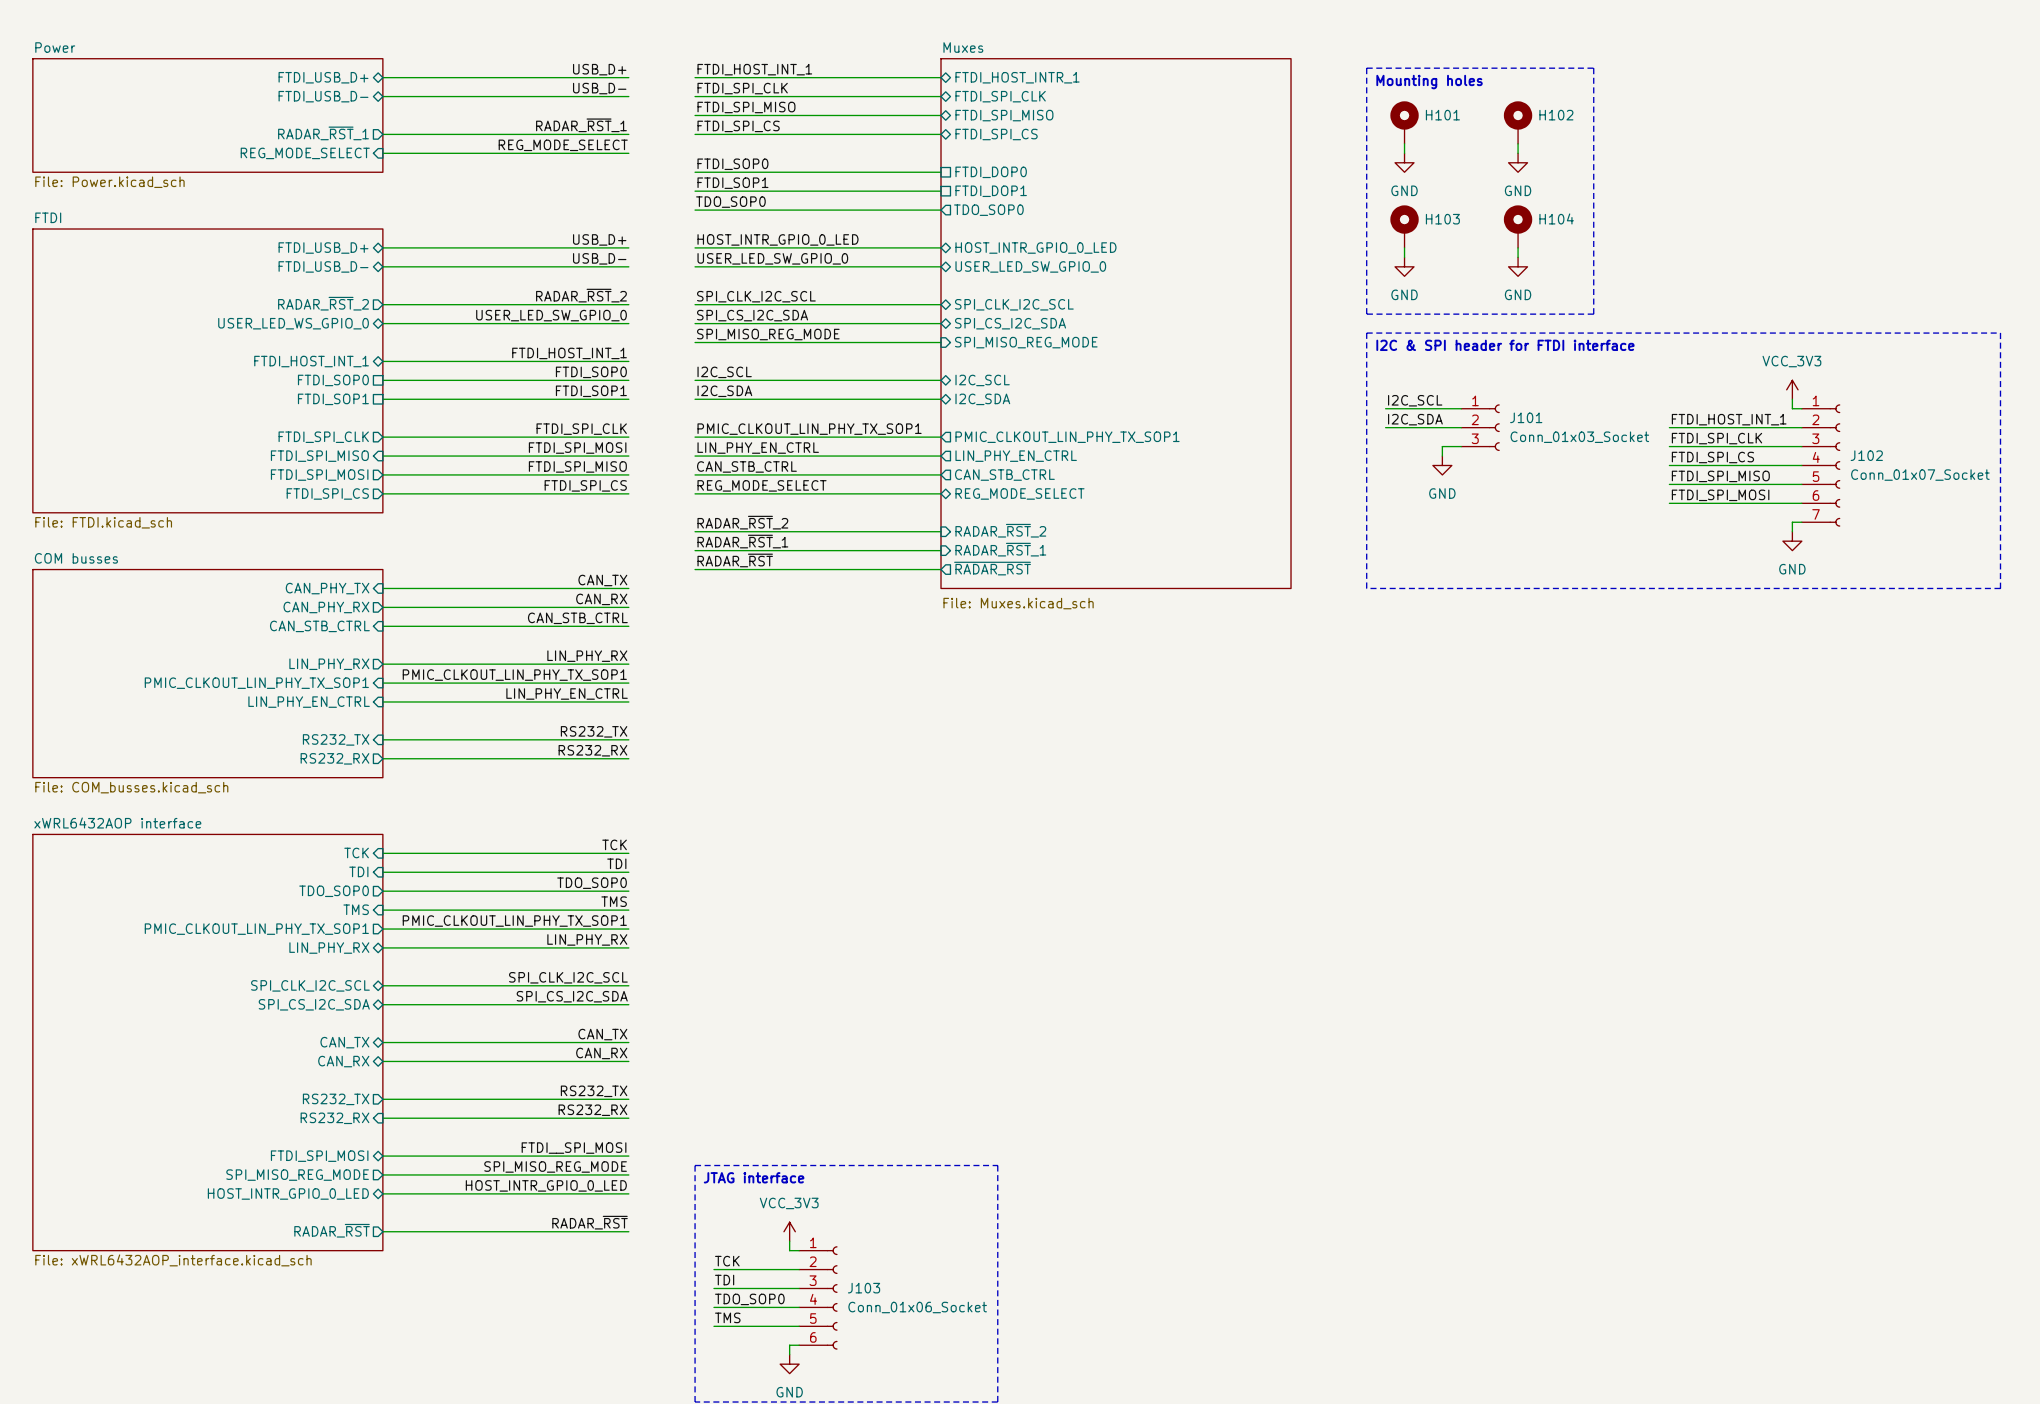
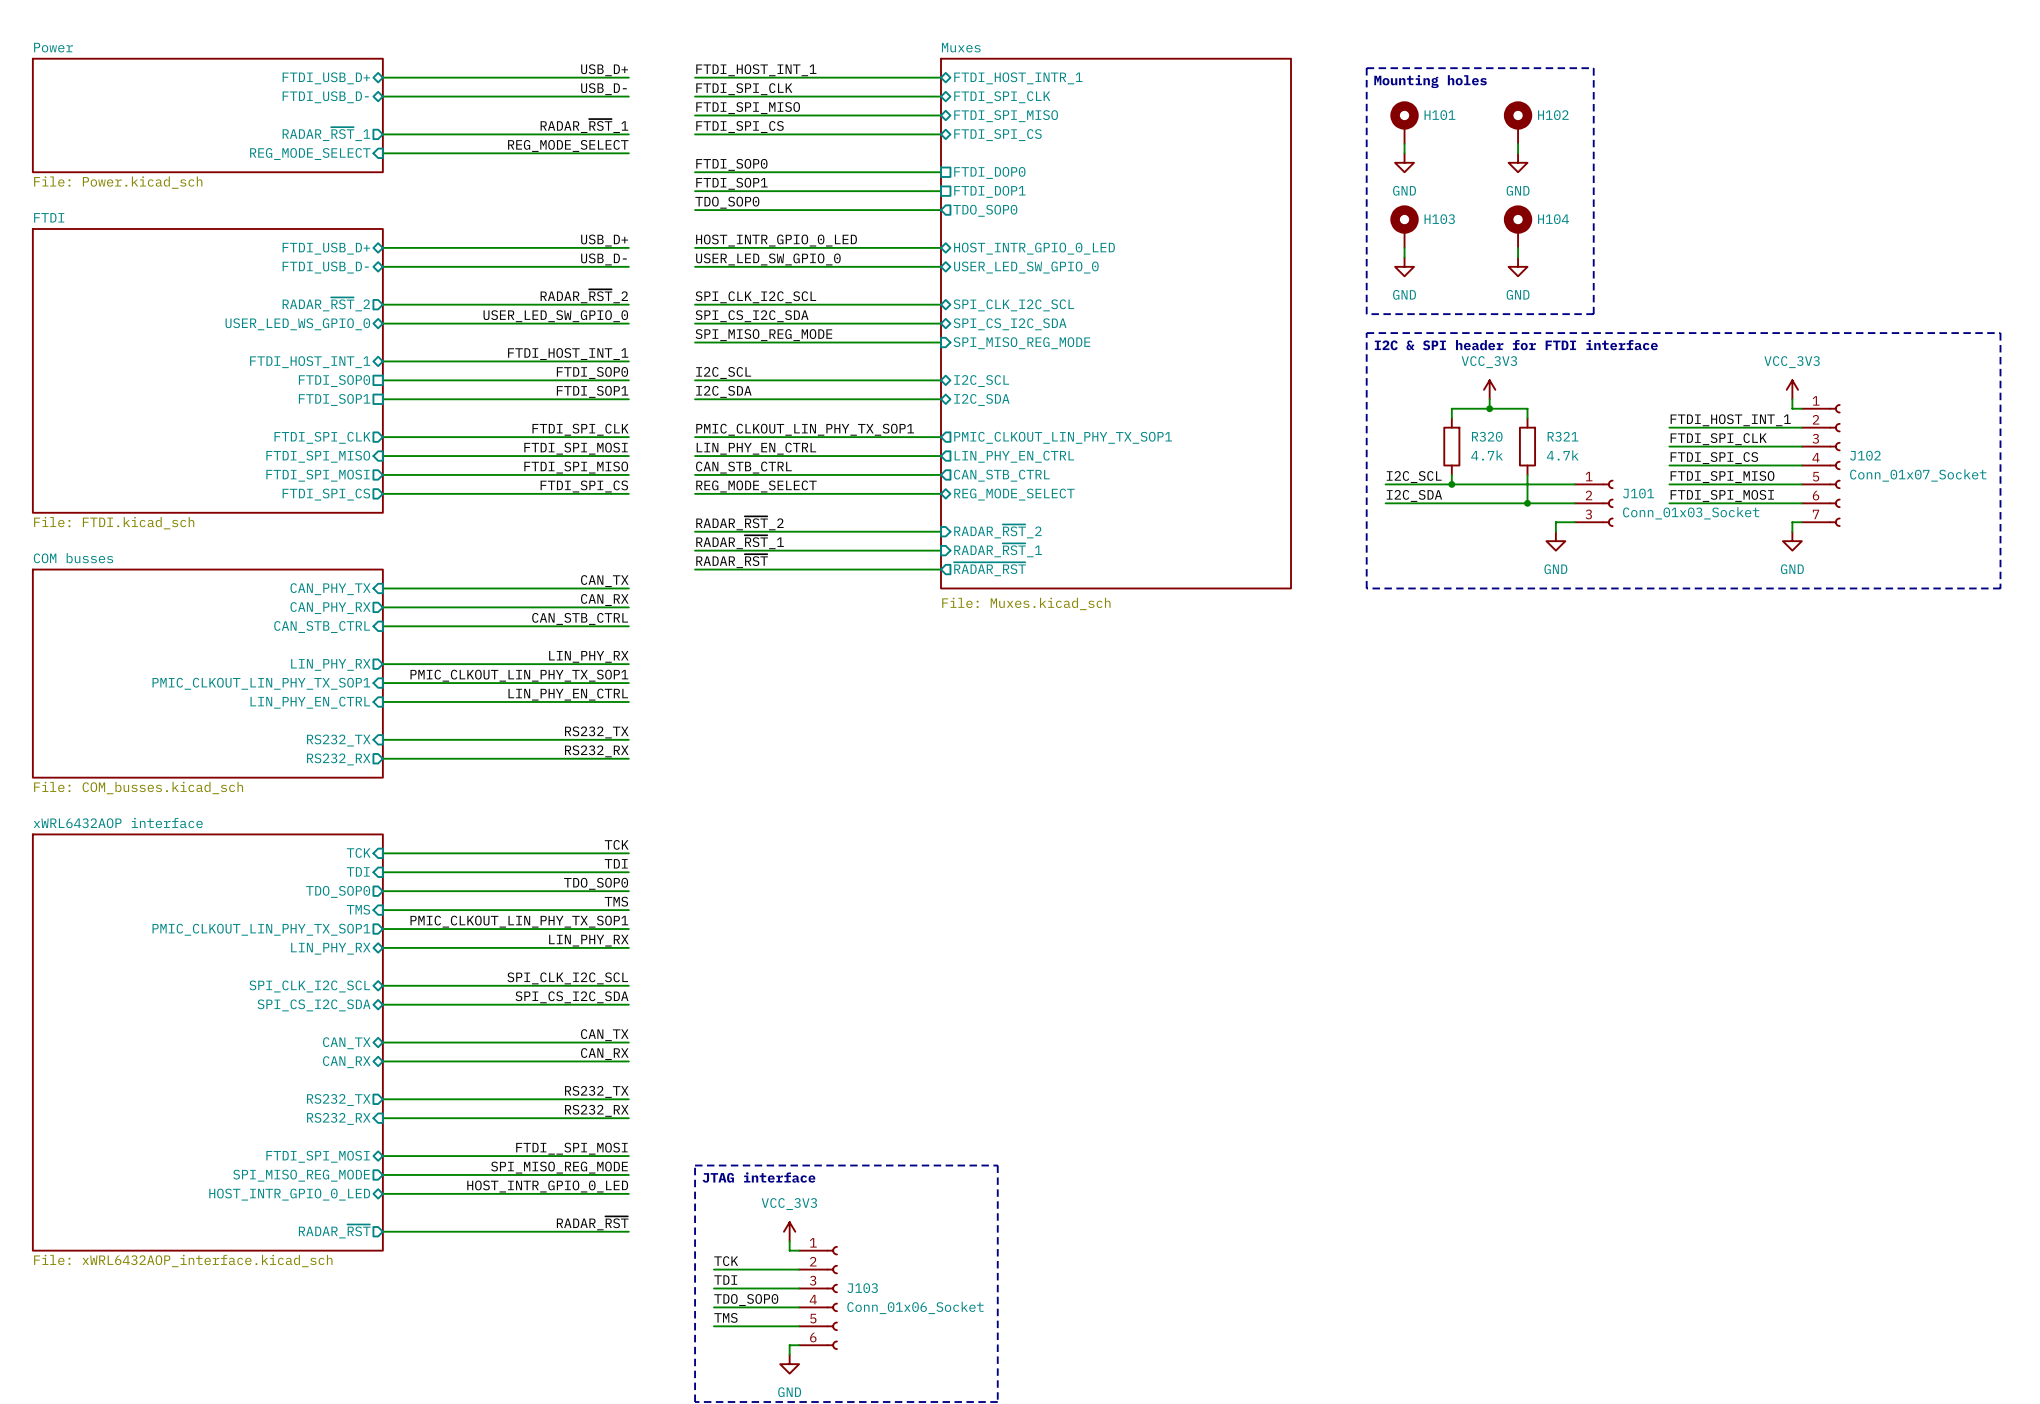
power symbol: none -> VCC_3V3 (1489, 389)
wire: none -> (1489, 399) (1489, 408)
label position: I2C_SCL (1415, 400) -> I2C_SCL (1414, 477)
wire: (1385, 408) (1451, 408) -> (1451, 418) (1451, 408)
wire: none -> (1461, 408) (1527, 408) (1527, 418)
junction: none -> (1489, 408)
label position: I2C_SDA (1415, 419) -> I2C_SDA (1414, 495)
wire: (1385, 427) (1461, 427) -> none
J101 position: (1480, 427) -> (1594, 503)
R320: none -> 4.7k (1451, 446)
wire: (1461, 446) (1442, 446) (1442, 456) -> (1574, 522) (1555, 522) (1555, 531)
R321: none -> 4.7k (1527, 446)
power symbol position: GND (1442, 465) -> GND (1555, 541)
wire: none -> (1451, 474) (1451, 484)
wire: none -> (1527, 474) (1527, 503)
wire: none -> (1385, 484) (1574, 484)
junction: none -> (1451, 484)
wire: none -> (1385, 503) (1574, 503)
junction: none -> (1527, 503)

